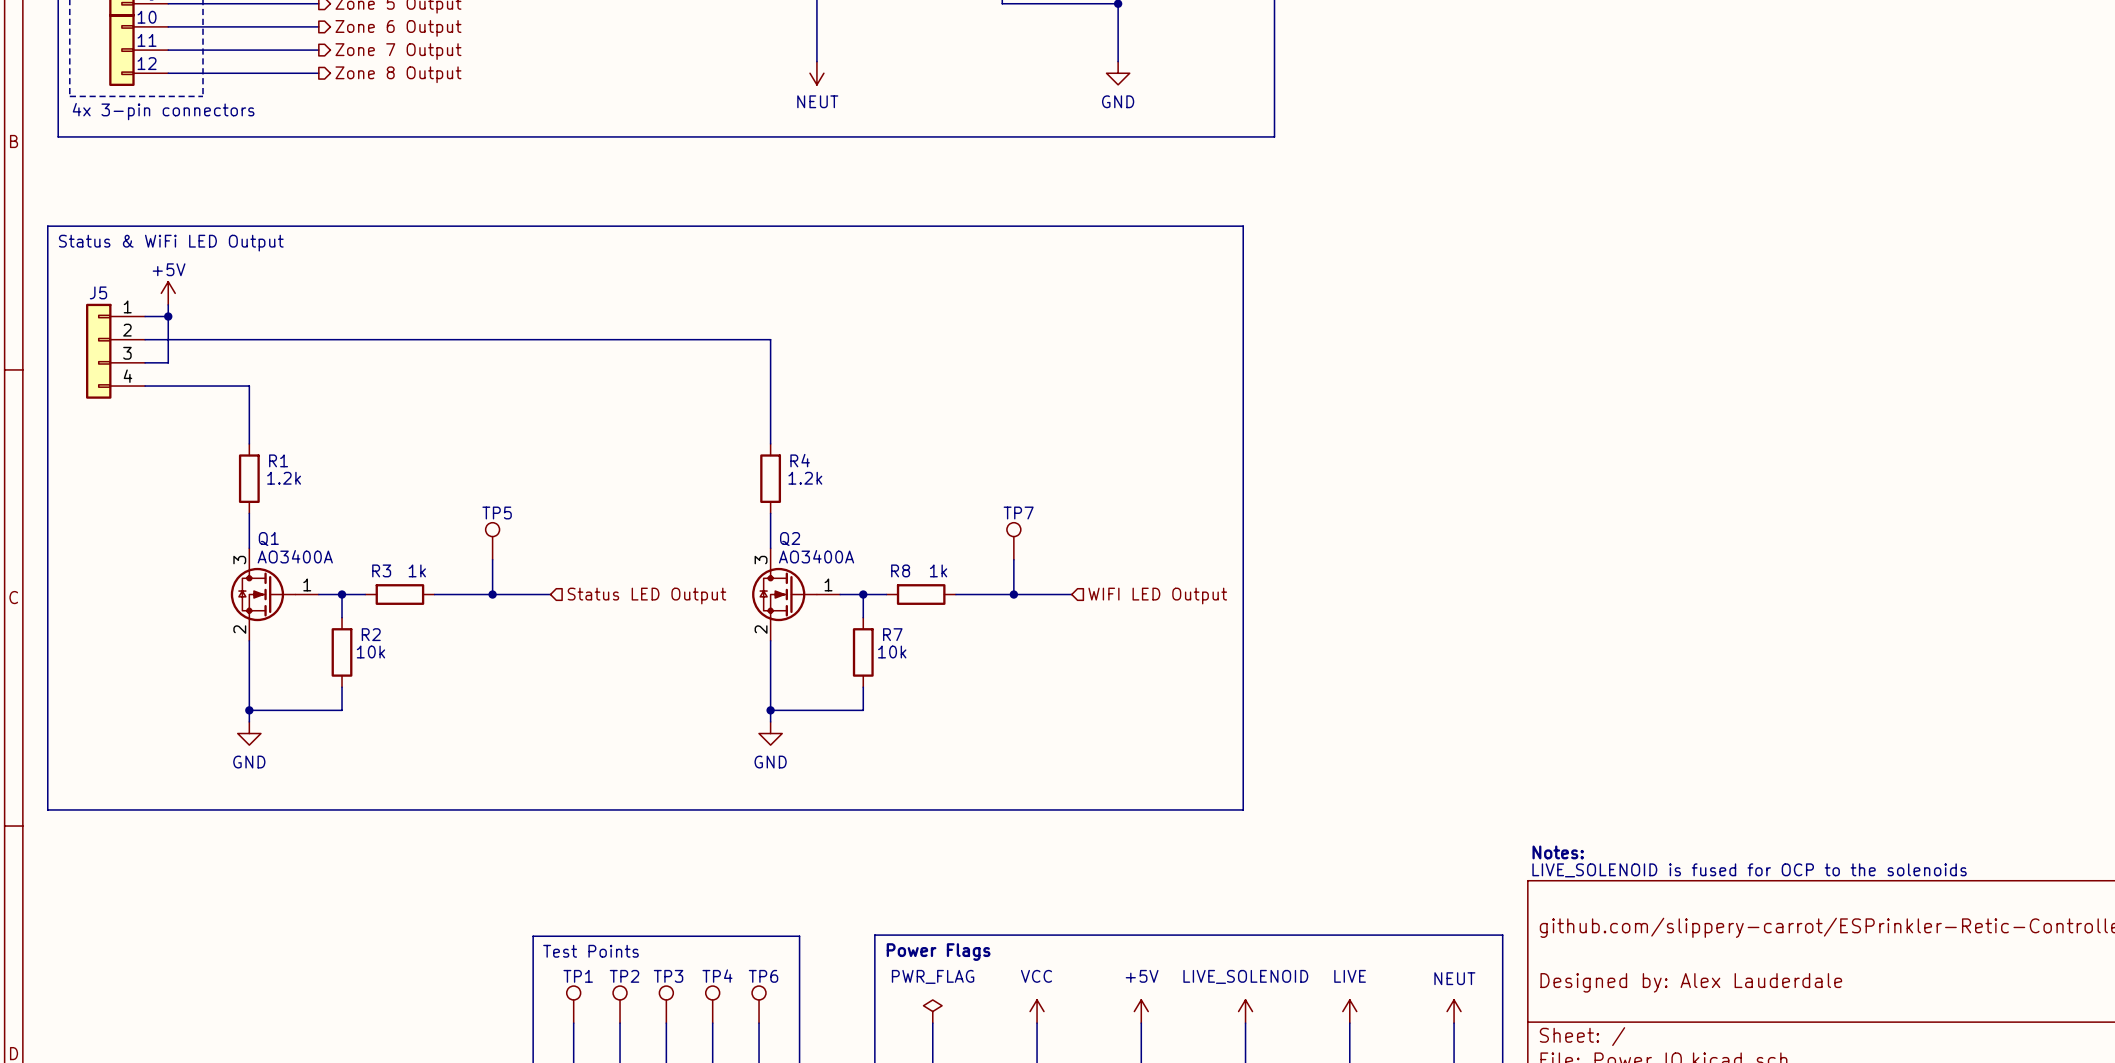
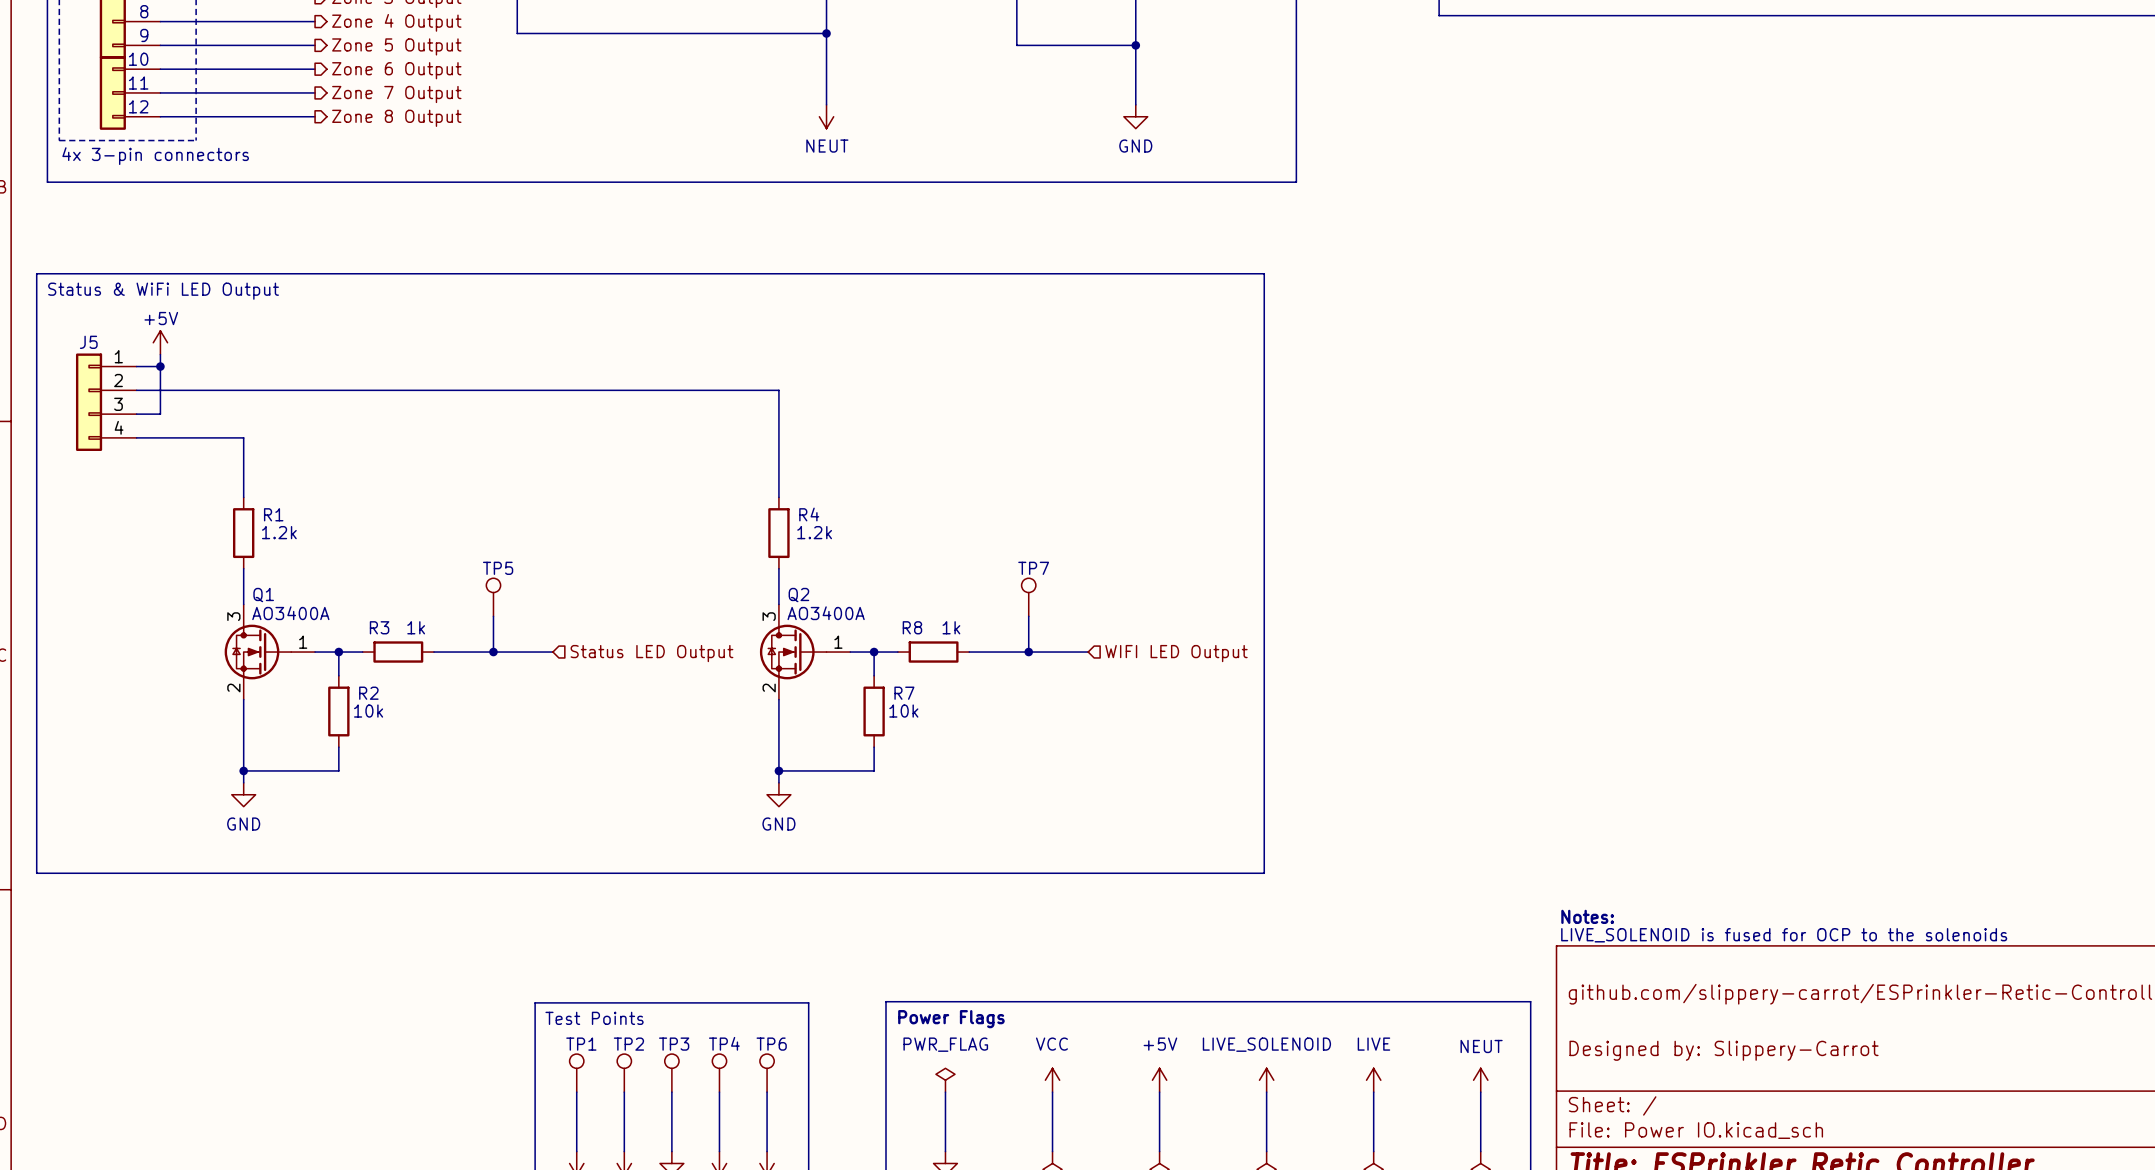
title block: Designed by: Alex Lauderdale (1691, 982) -> Designed by: Slippery-Carrot (1724, 1050)

